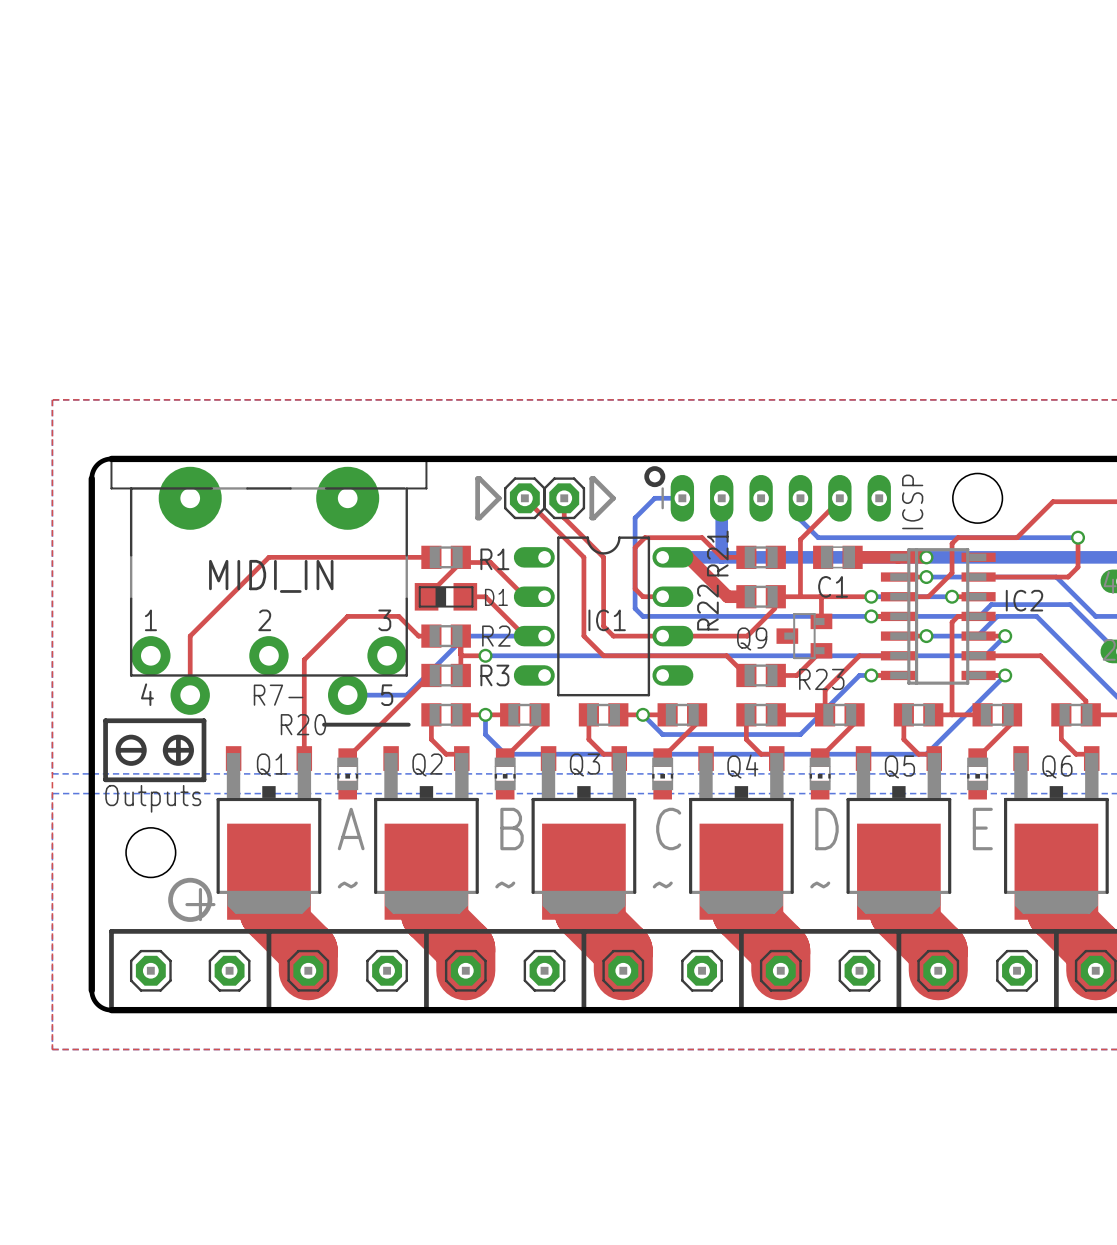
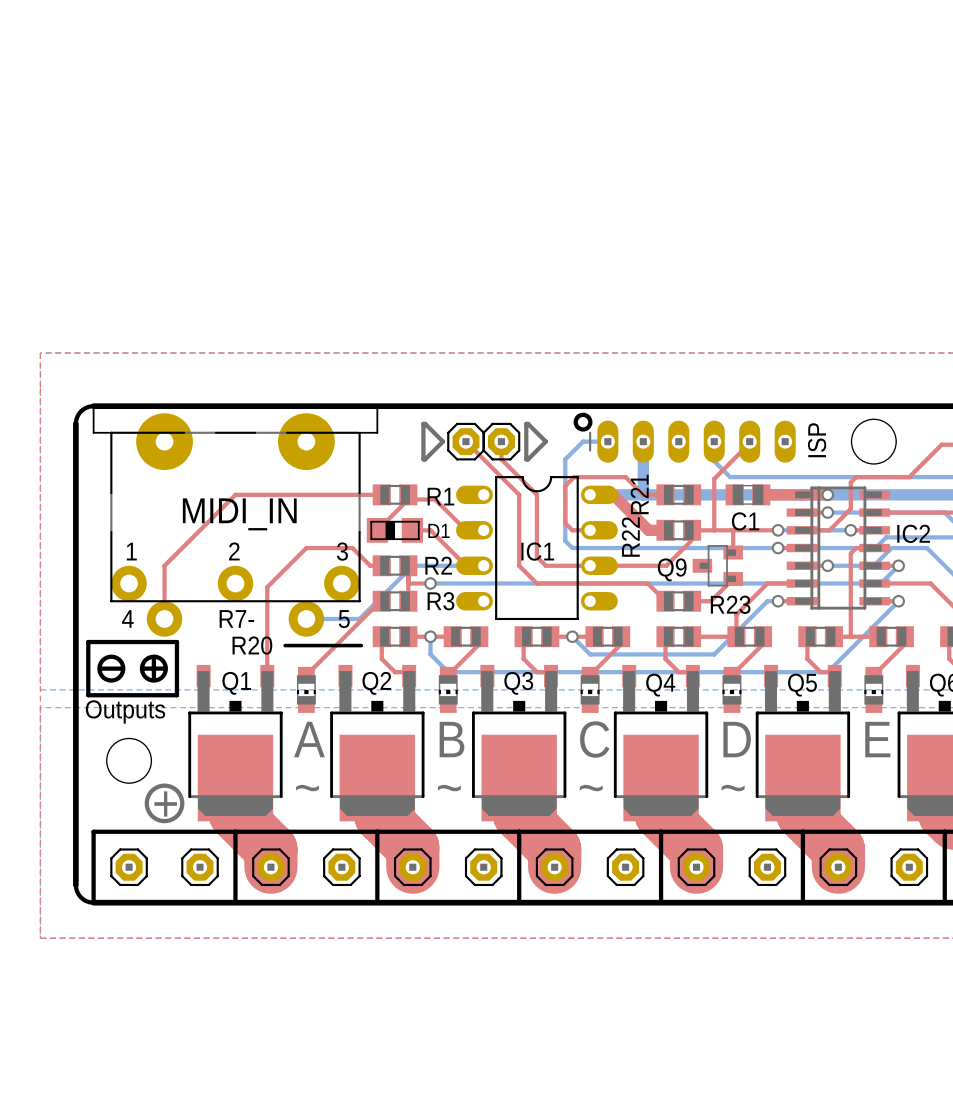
text: ICSP (912, 501) -> ISP (817, 440)

